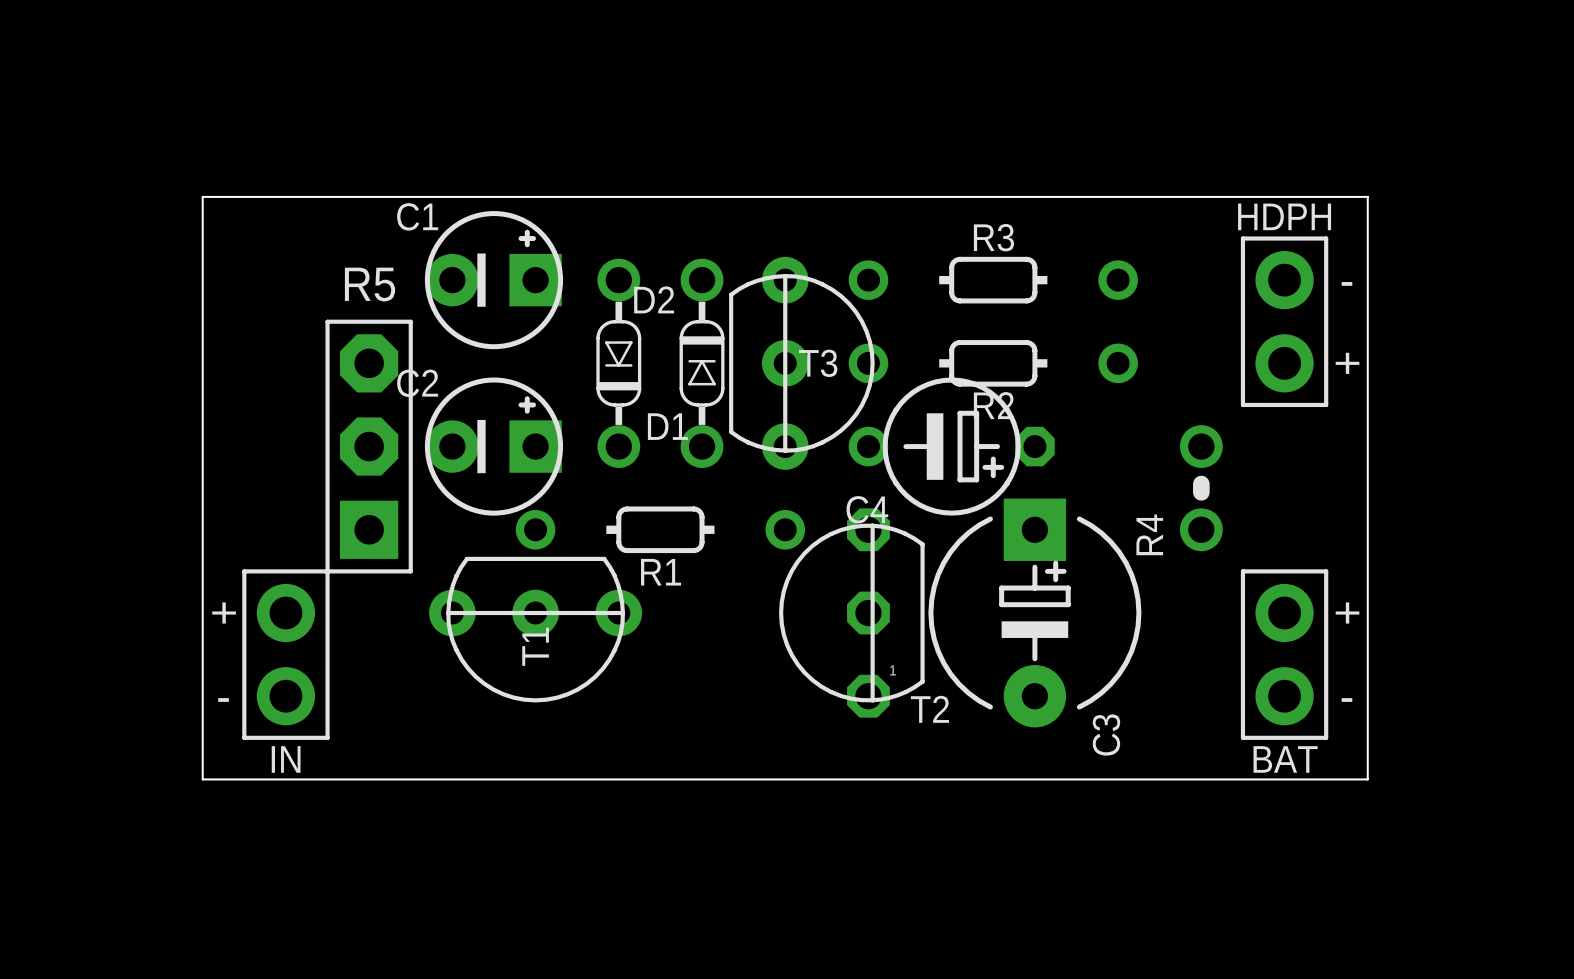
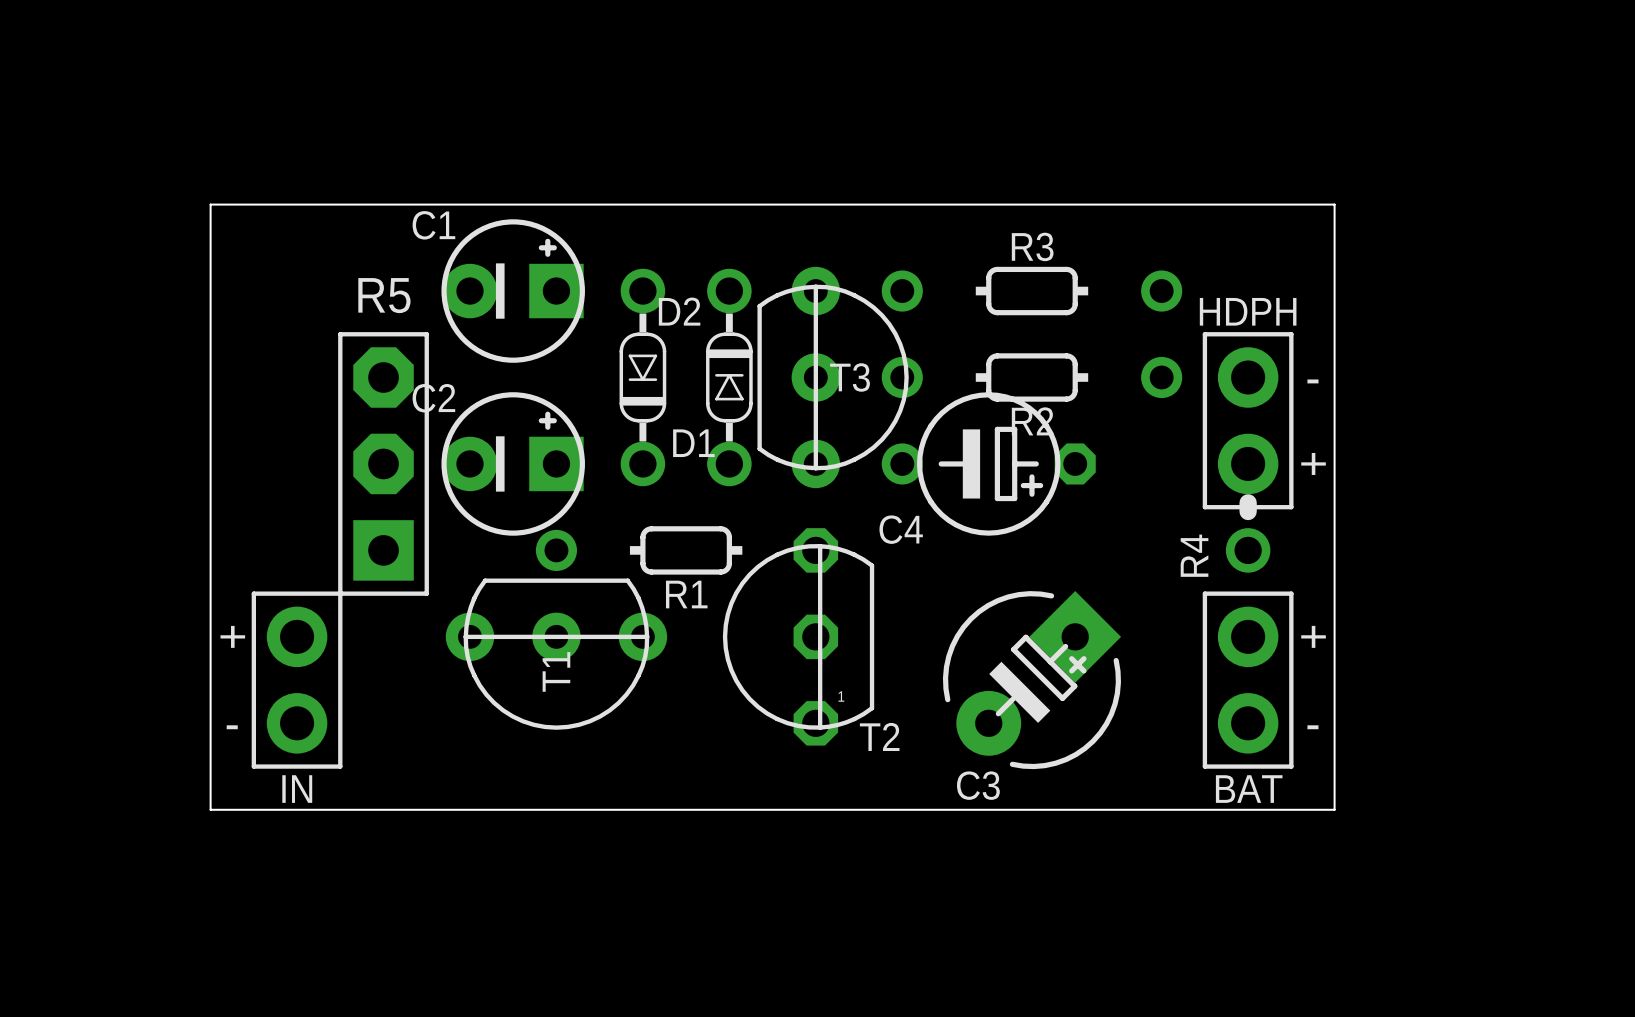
board edge: (1284, 196) (1367, 196) (1367, 779) (1284, 779) -> (1334, 204) (1334, 809)
HDPH position: (1284, 321) -> (1248, 420)
C3 footprint: [928, 498, 1142, 728] -> [942, 591, 1122, 770]
T2 position: (851, 613) -> (798, 636)
BAT position: (1284, 654) -> (1248, 680)
C3 name position: C3 (1106, 735) -> C3 (978, 785)

